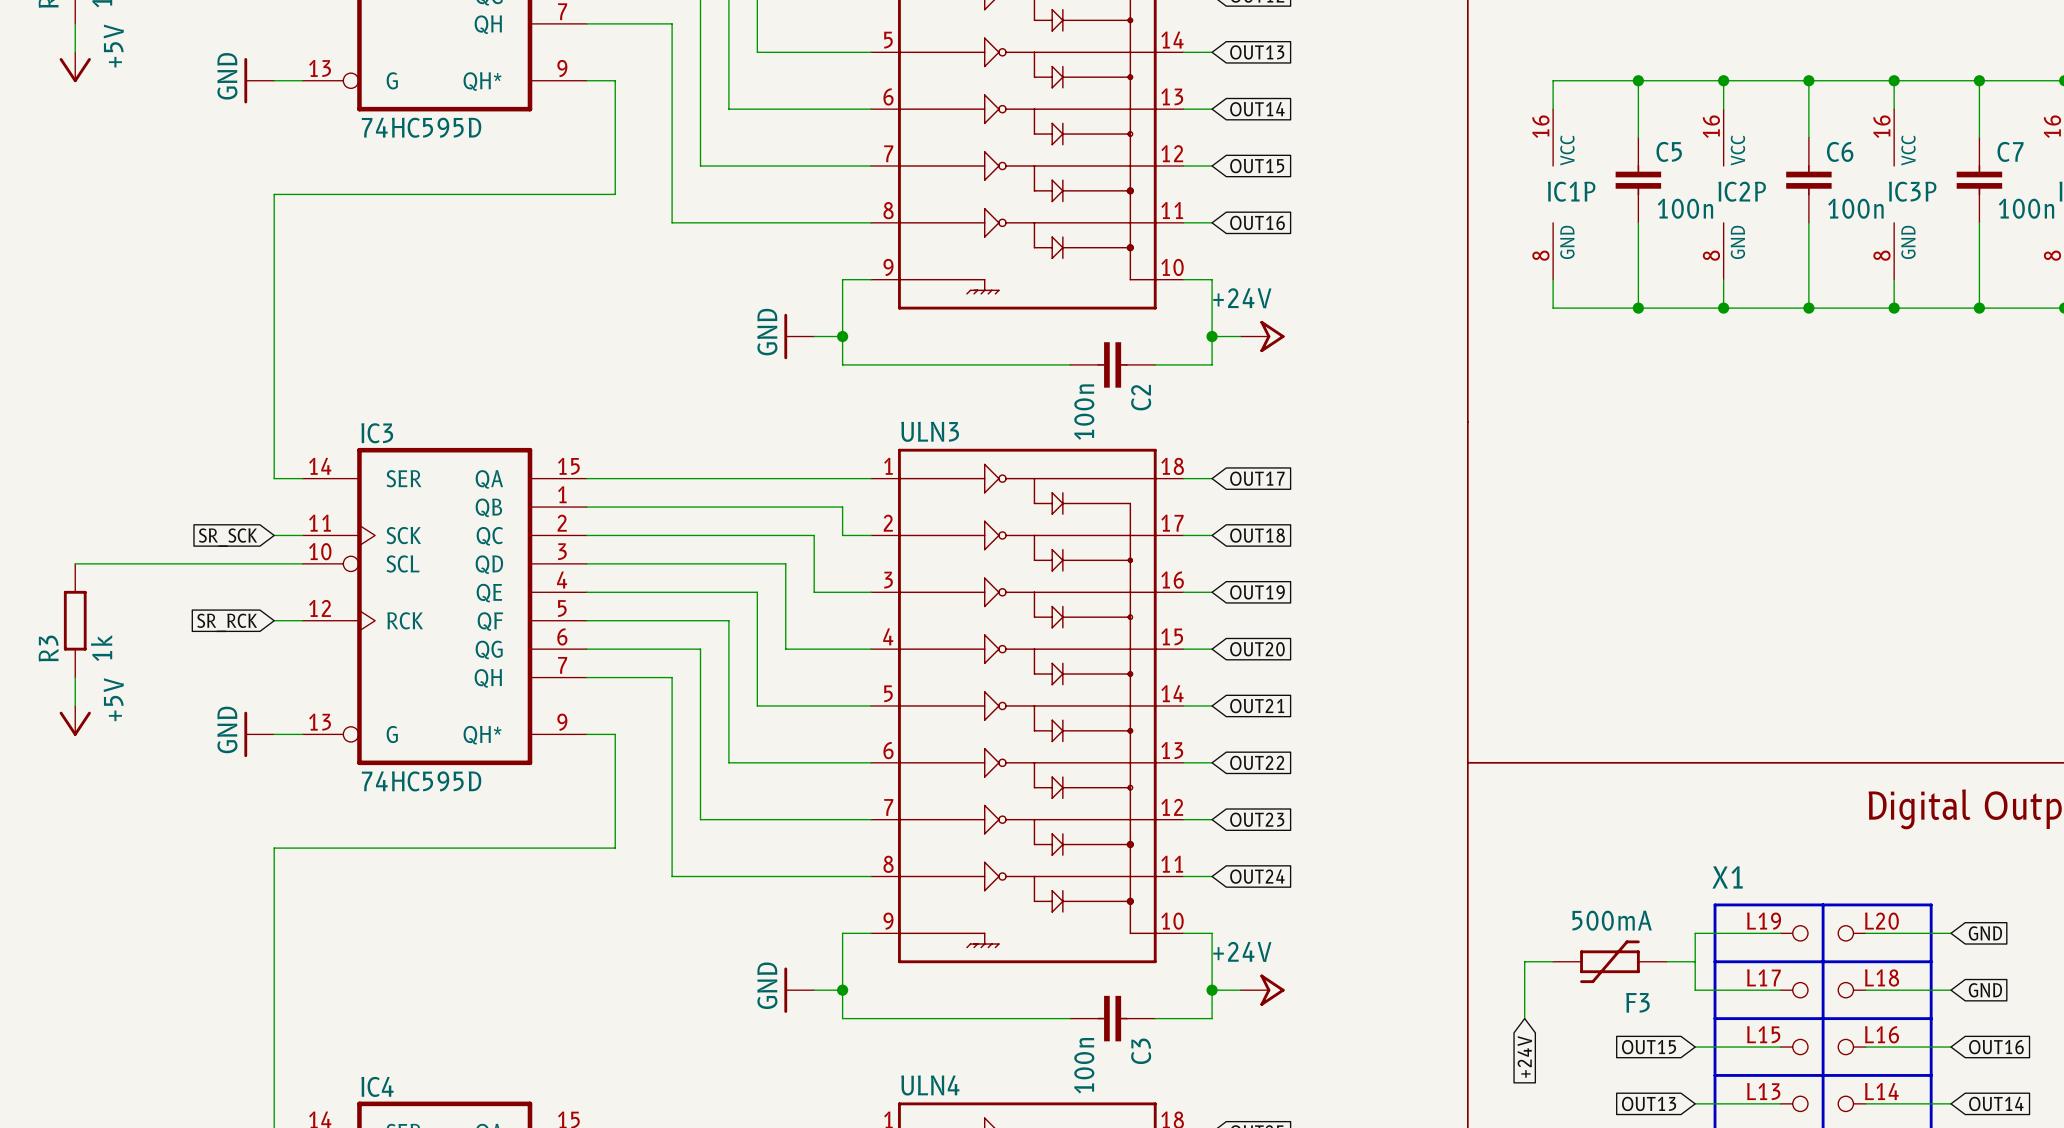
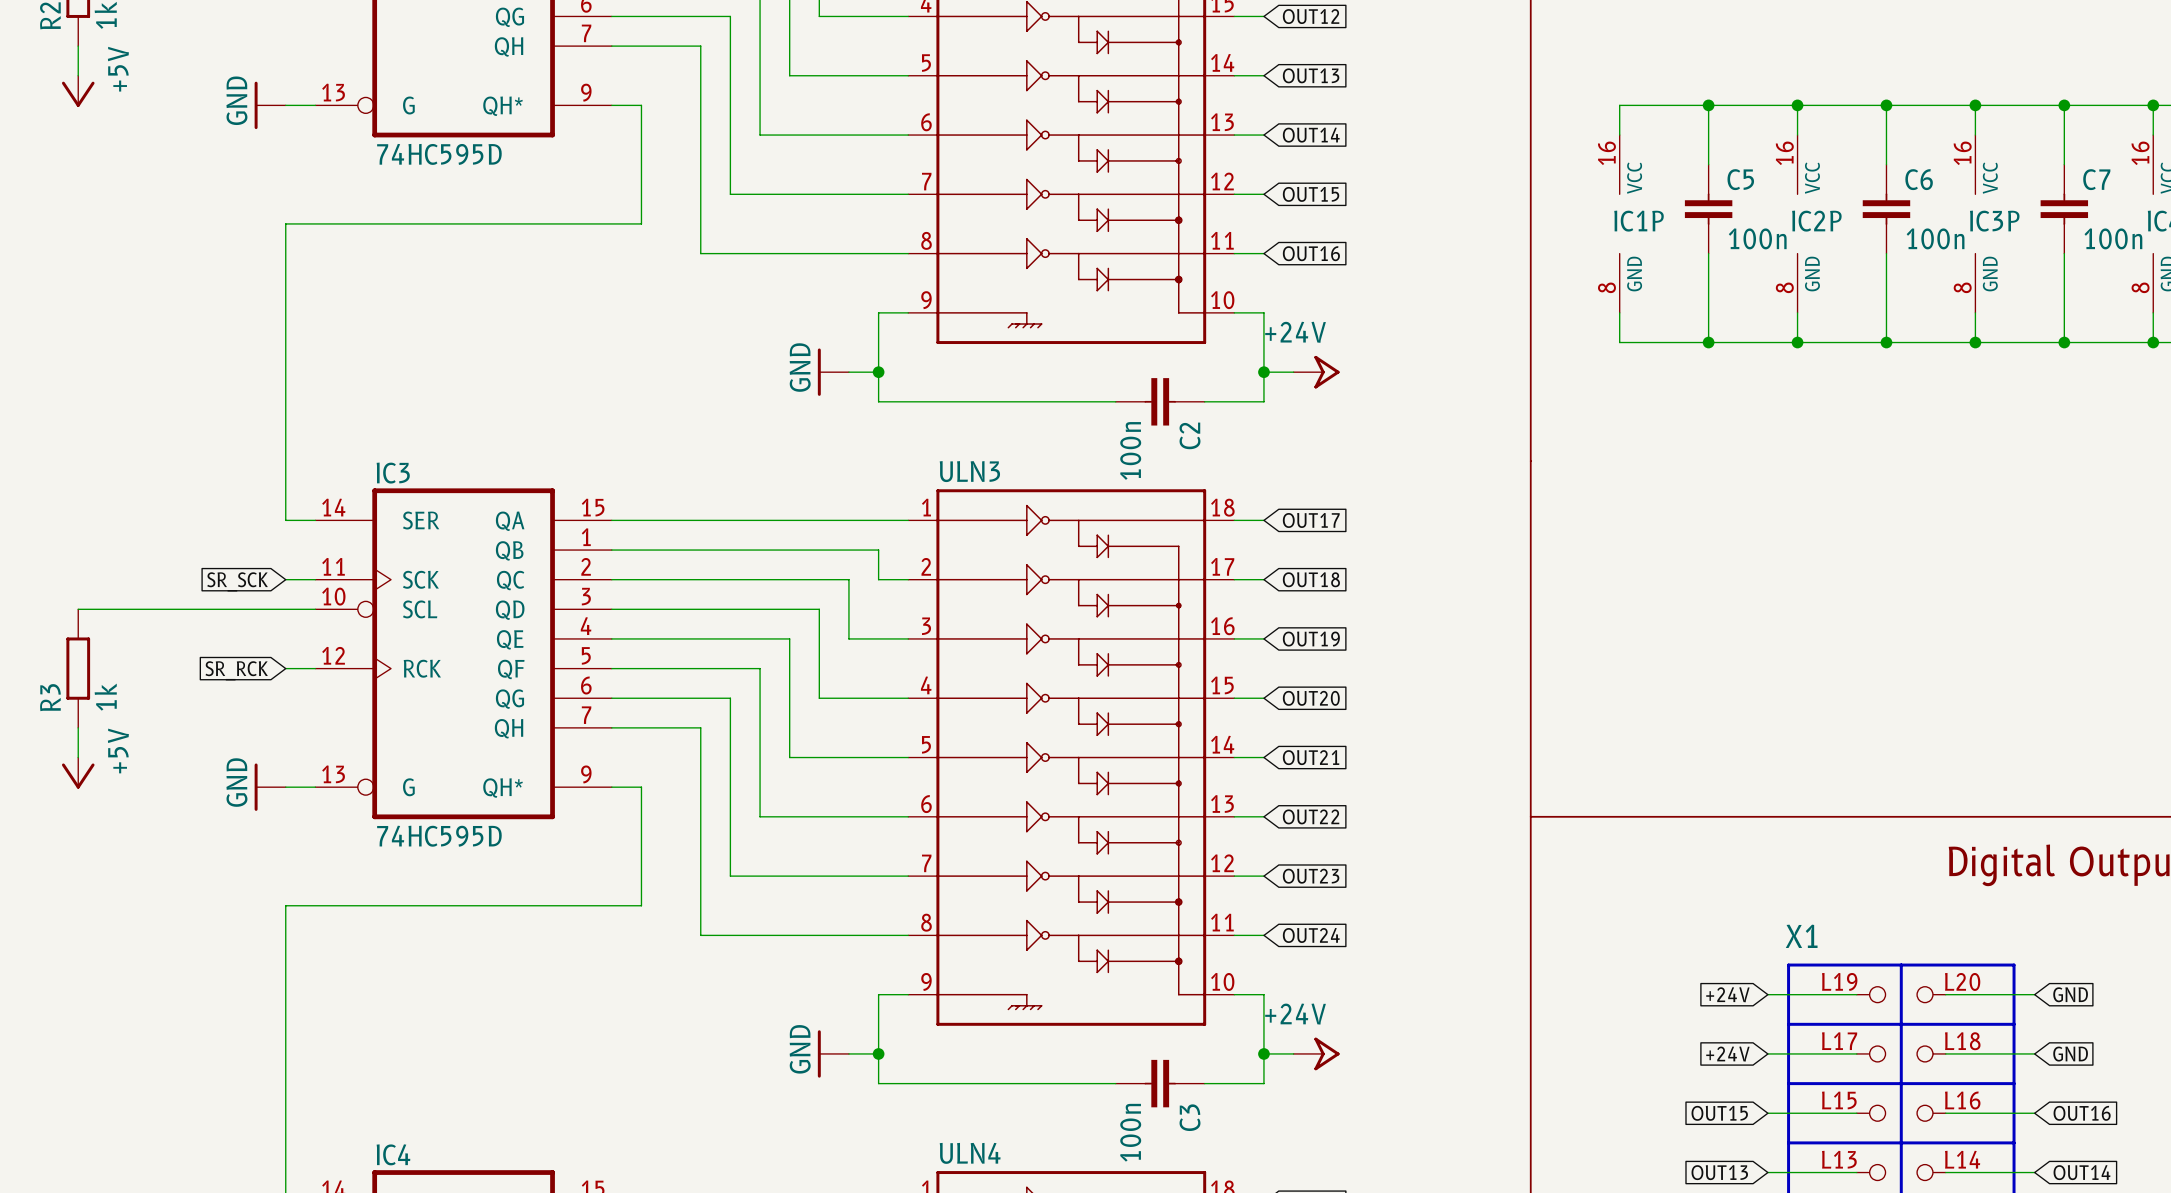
global label: none -> +24V (1727, 994)
wire: (1695, 933) (1695, 990) -> none
wire: (1553, 961) (1524, 961) (1524, 1018) -> none
F3: 500mA (1609, 961) -> none
wire: (1666, 961) (1695, 961) -> none
global label: none -> +24V (1727, 1054)
global label: +24V (1524, 1056) -> none

